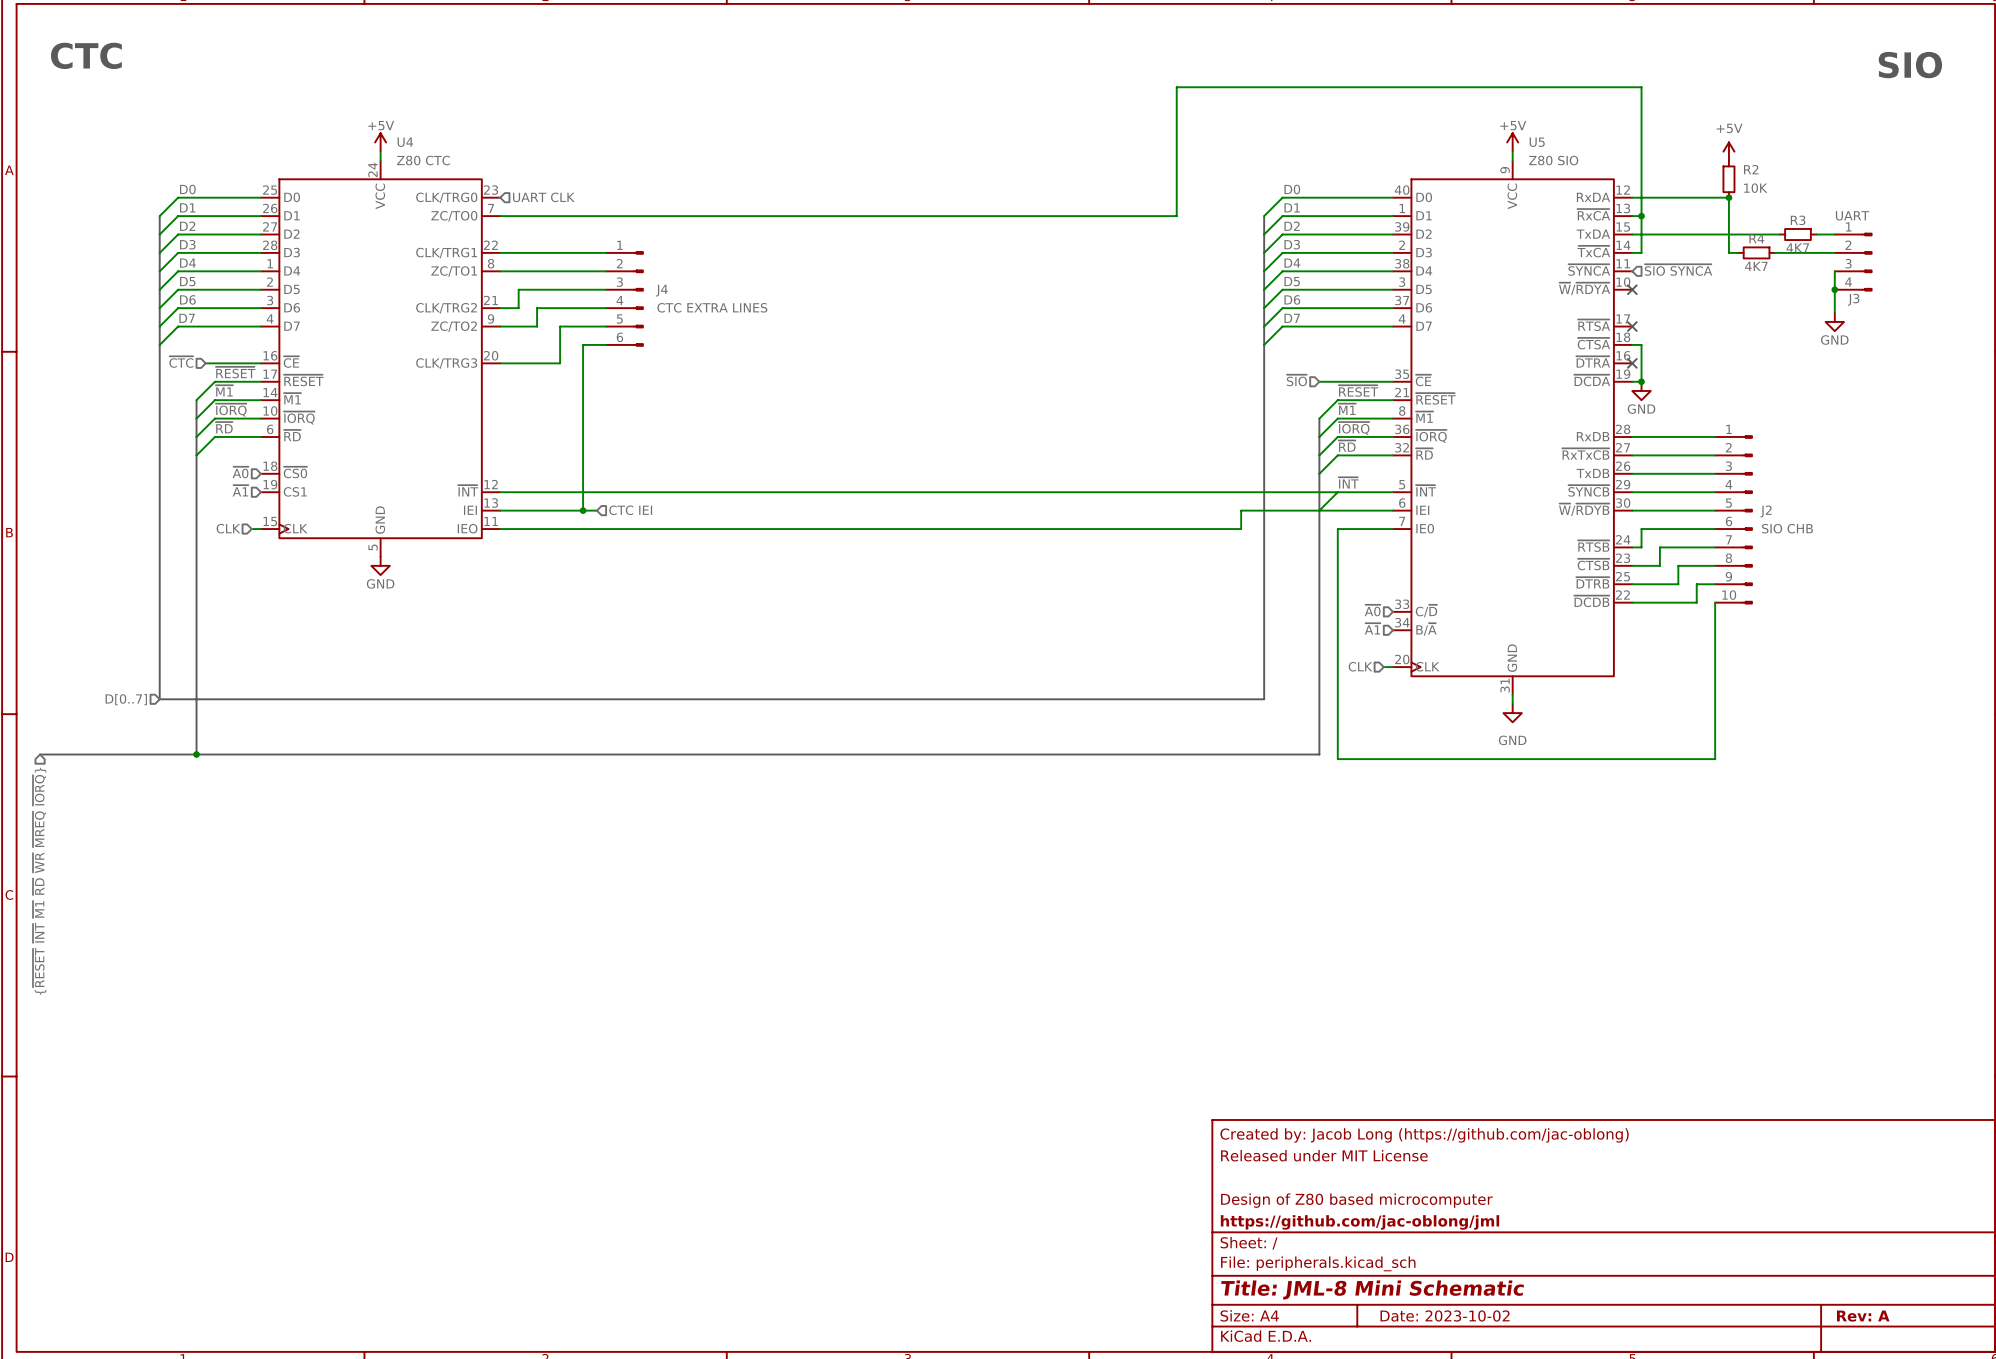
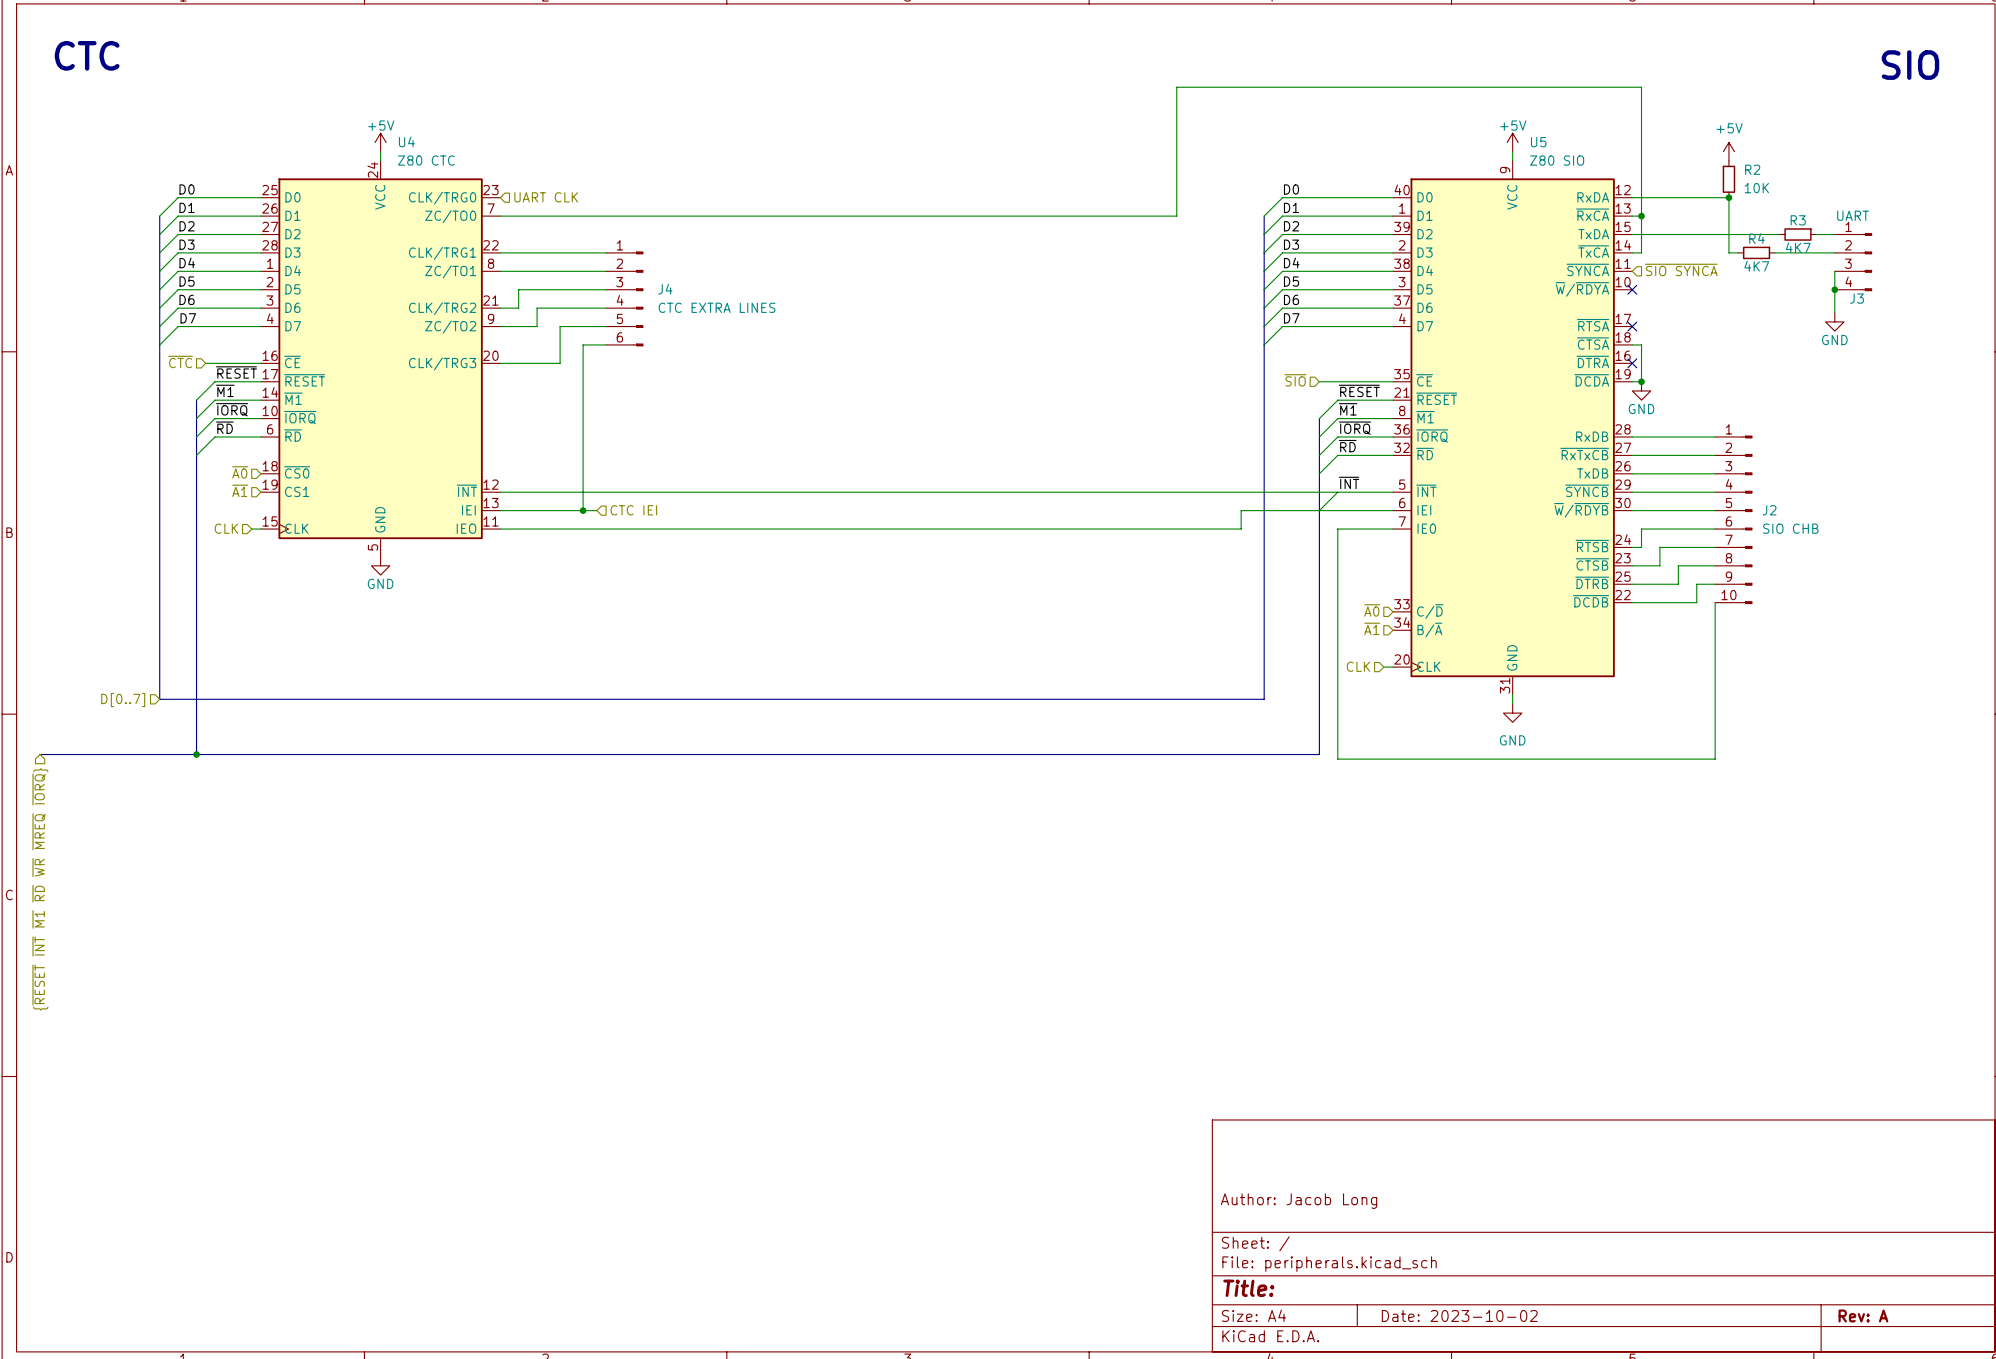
title block: Created by: Jacob Long (https://github.com/jac-oblong) (1424, 1135) -> none
title block: Released under MIT License (1324, 1155) -> none
title block: Design of Z80 based microcomputer (1356, 1200) -> Author: Jacob Long (1299, 1201)
title block: https://github.com/jac-oblong/jml (1359, 1222) -> none
title block: Title: JML-8 Mini Schematic (1372, 1289) -> Title: (1248, 1288)

